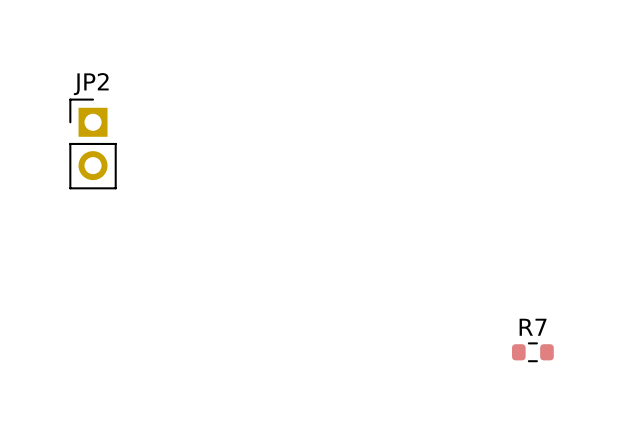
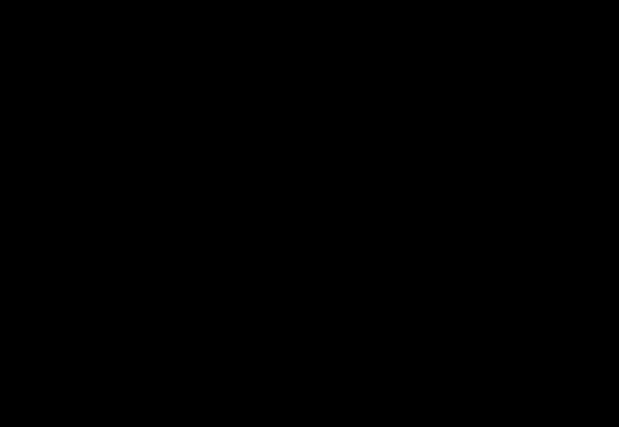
JP2: (93, 143) -> none
R7: (532, 352) -> none

